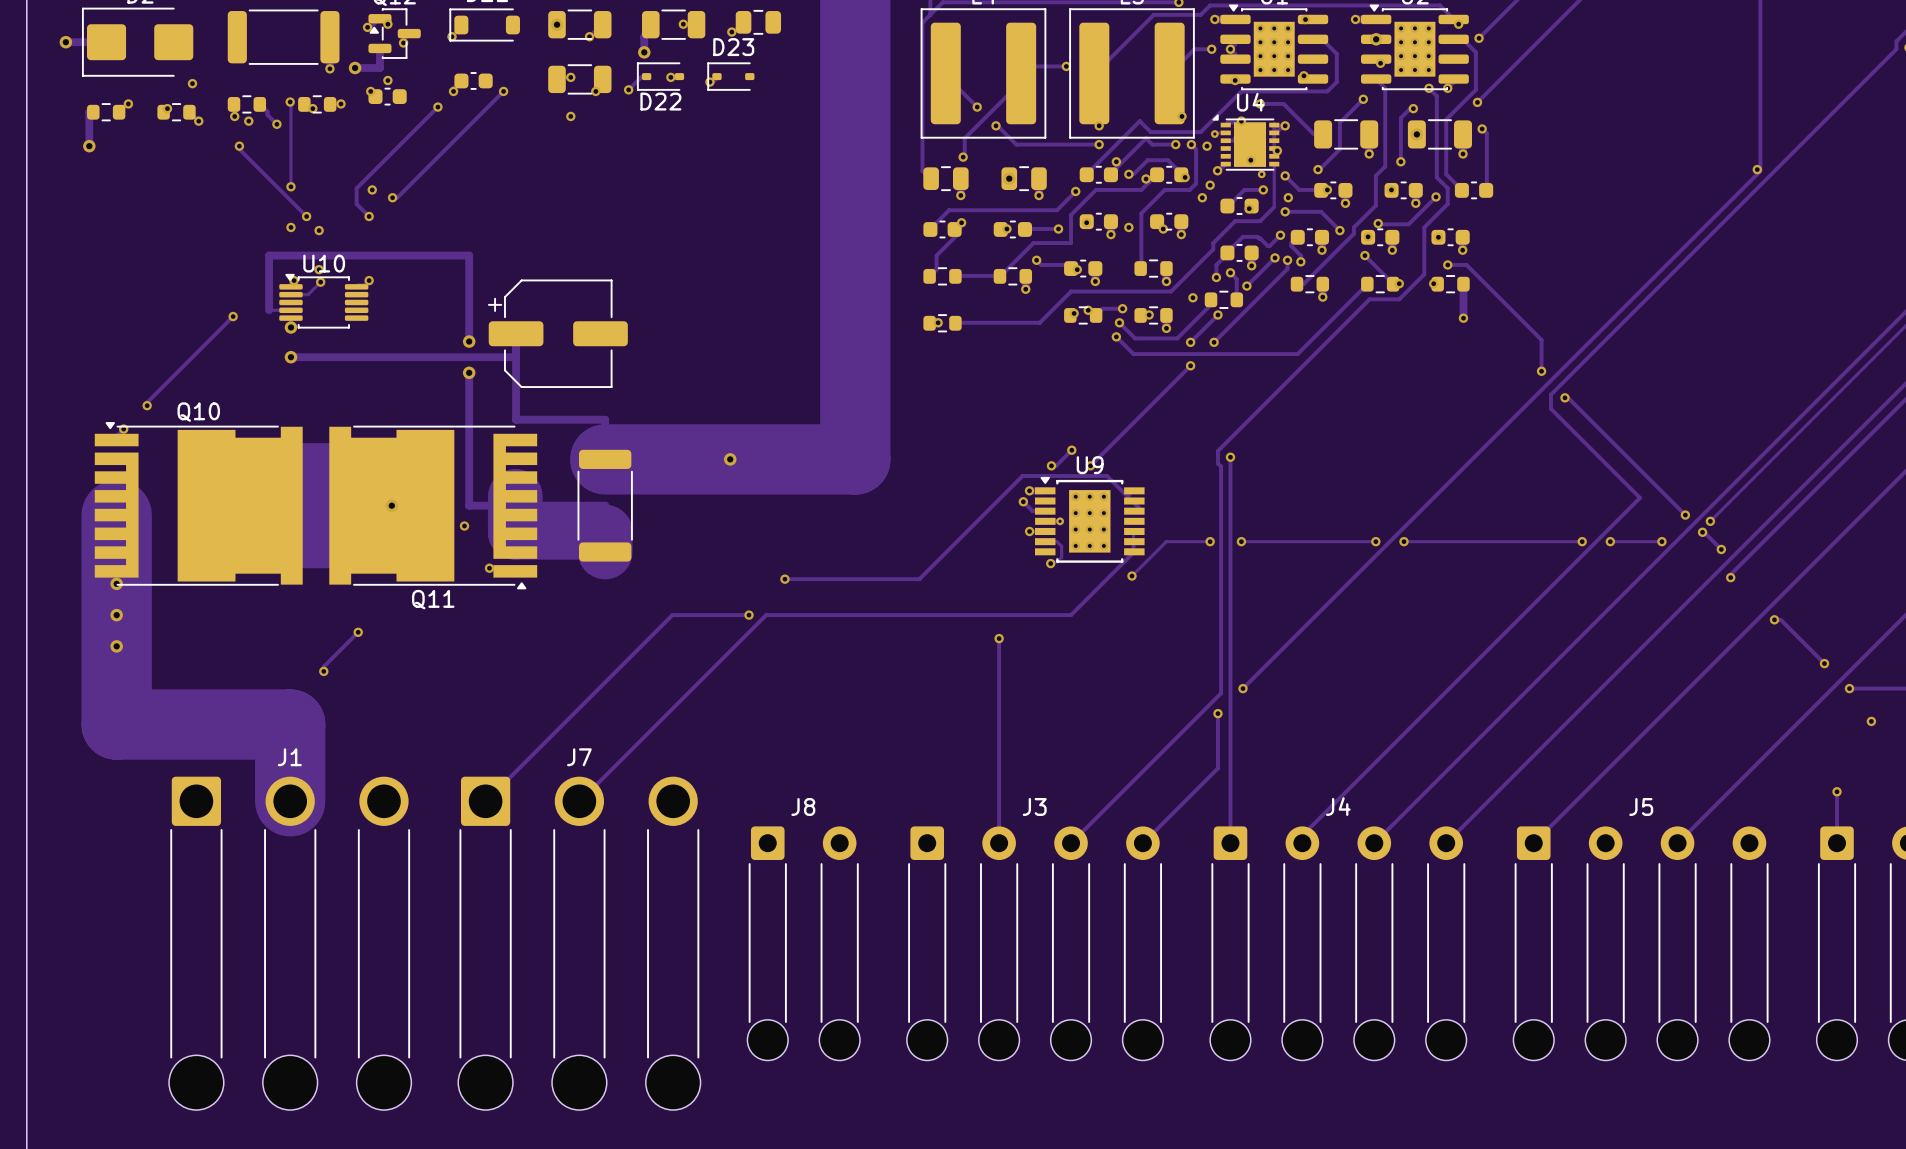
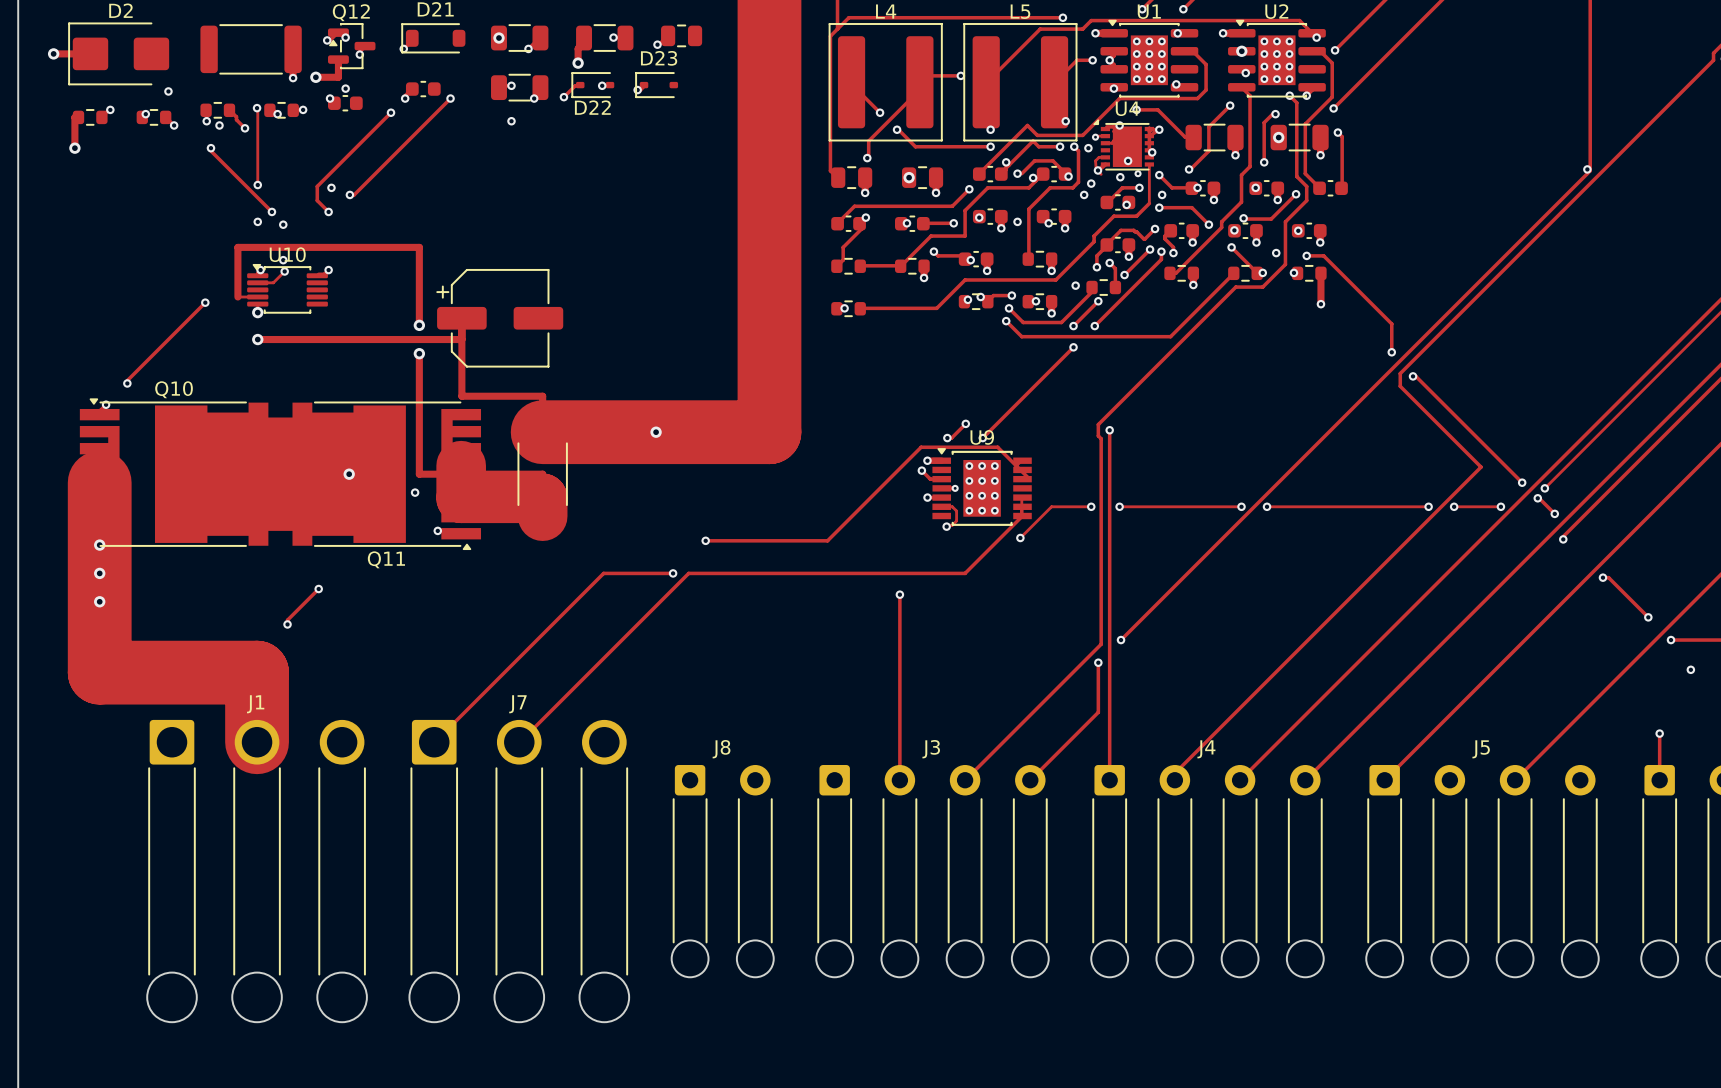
track: none -> (1105, 157) (1099, 157) (1095, 160) (1096, 169) (1101, 174)
via: none -> (1120, 177)
via: none -> (1276, 253)

